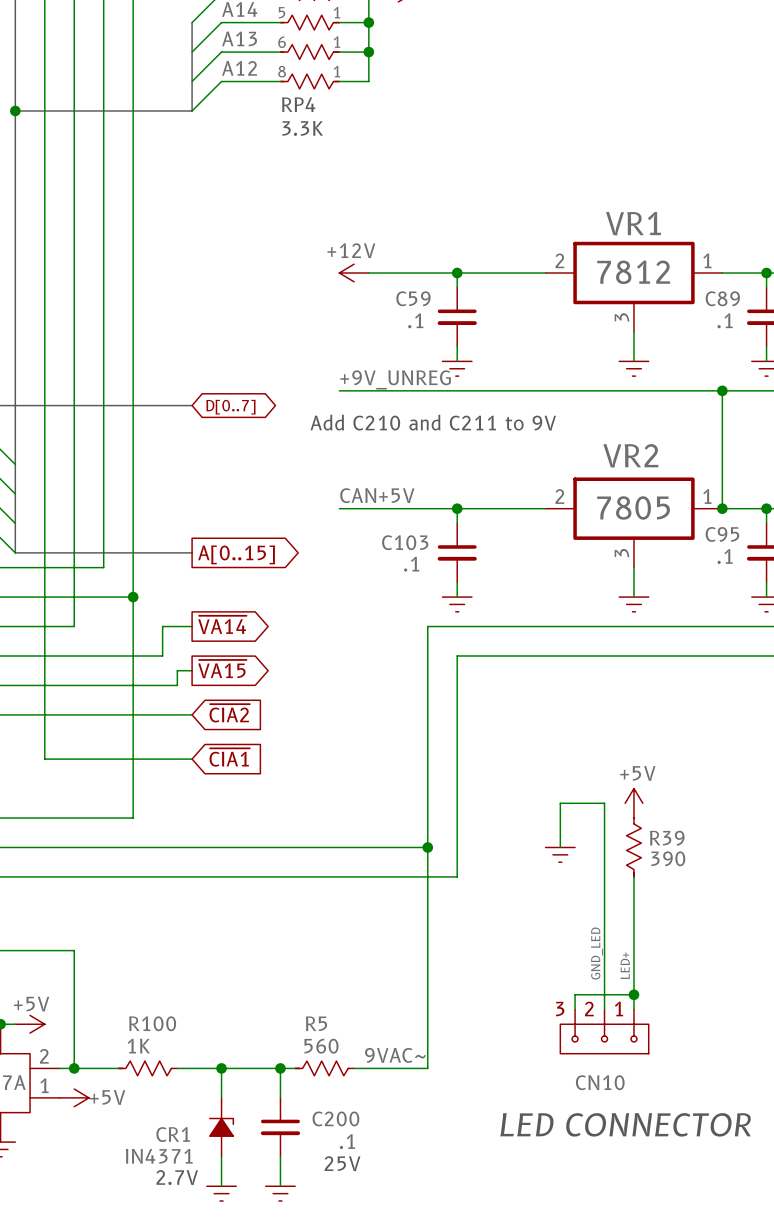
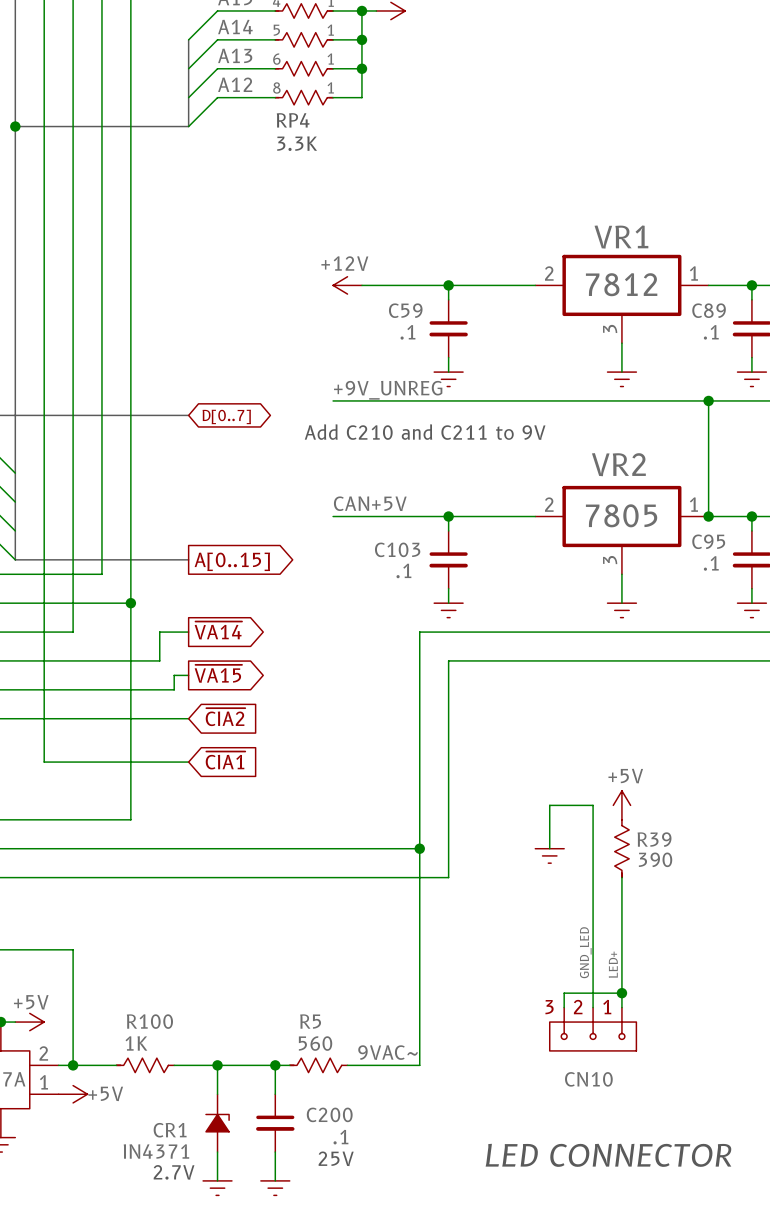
text position: LED CONNECTOR (625, 1124) -> LED CONNECTOR (608, 1155)

